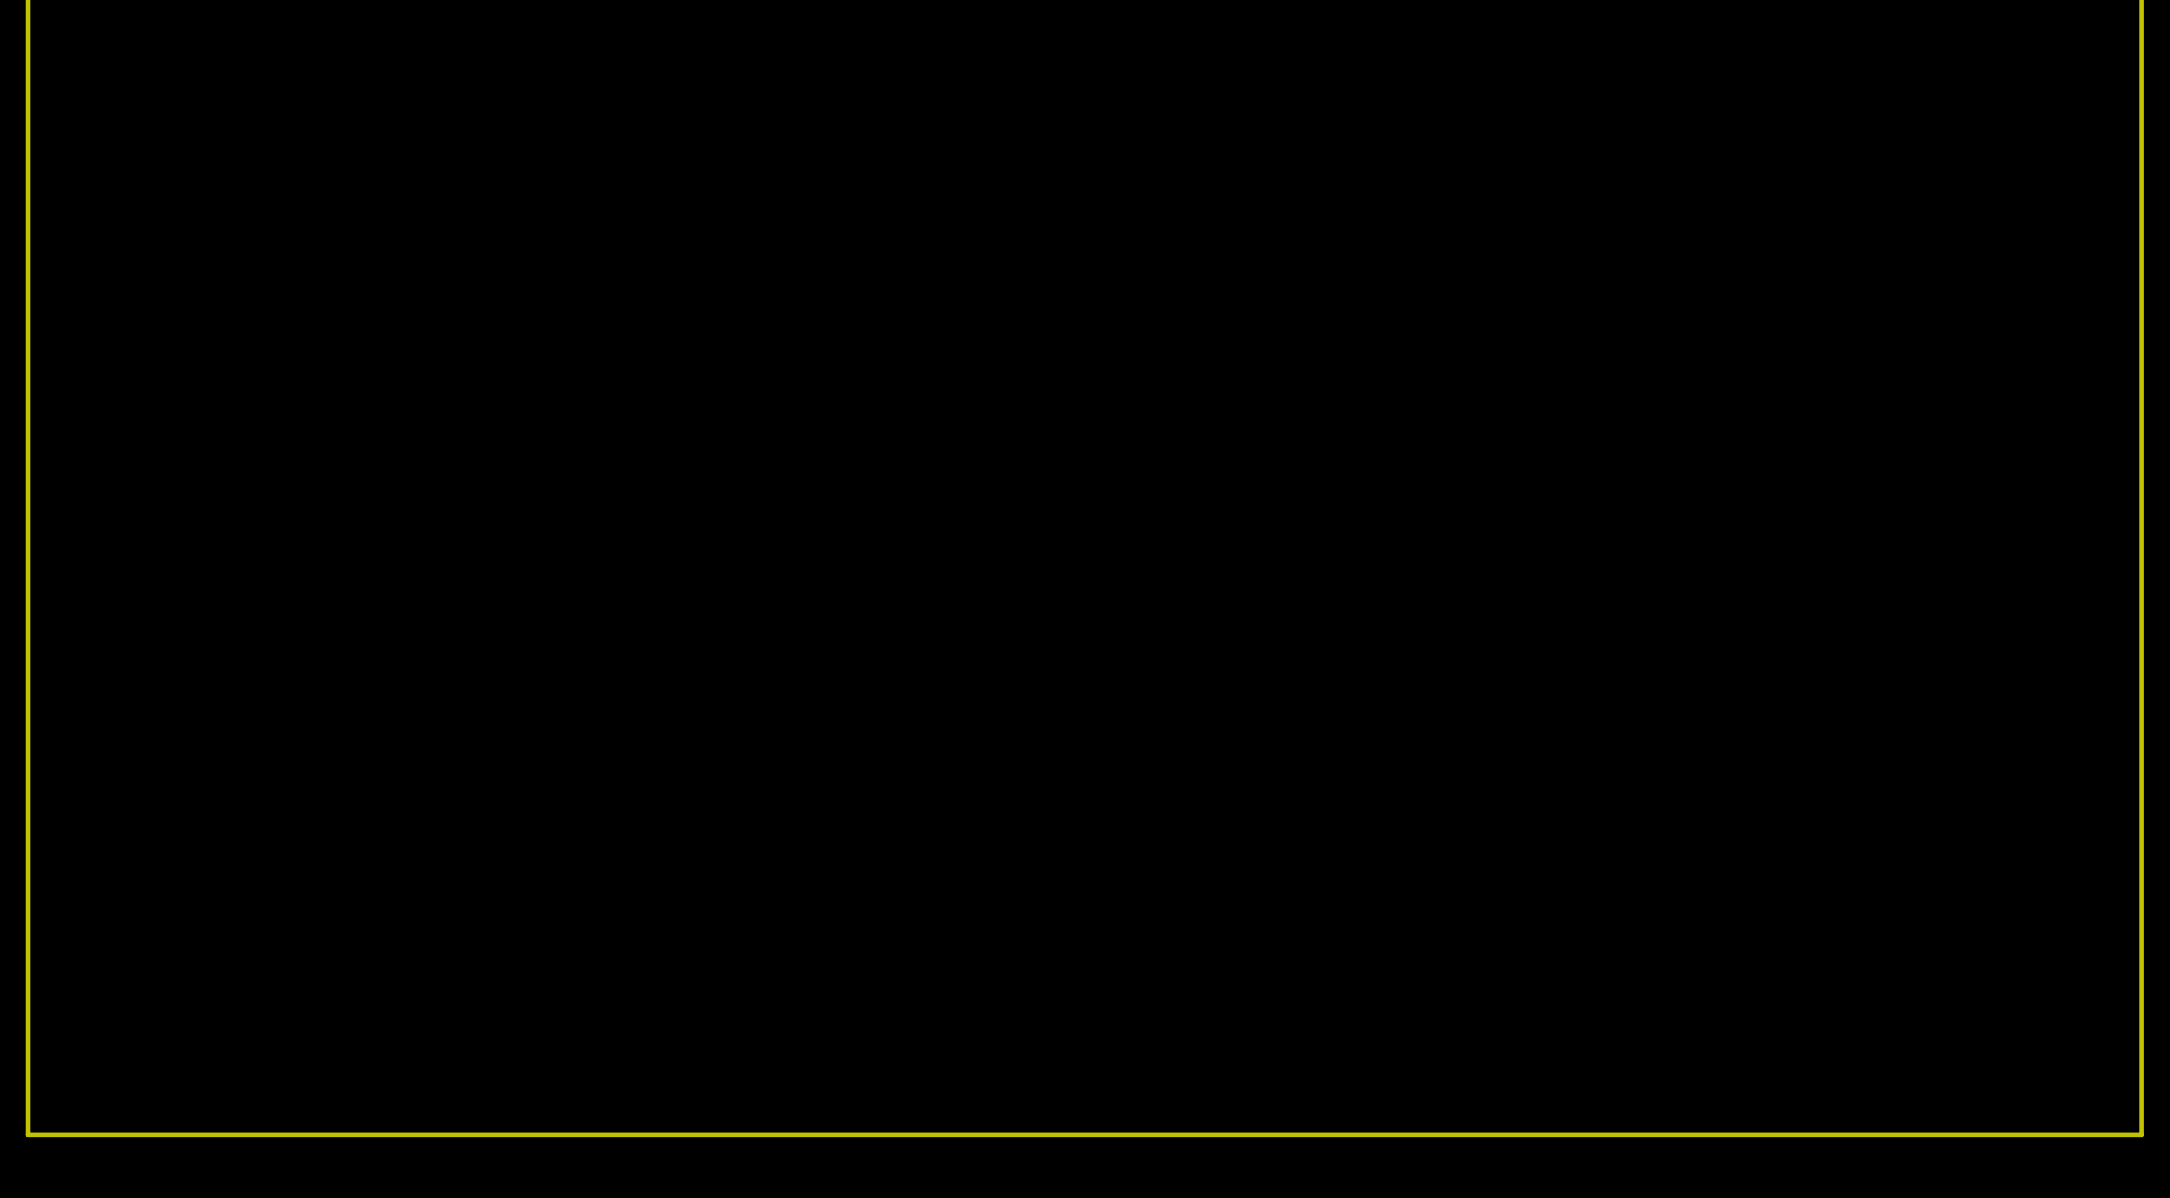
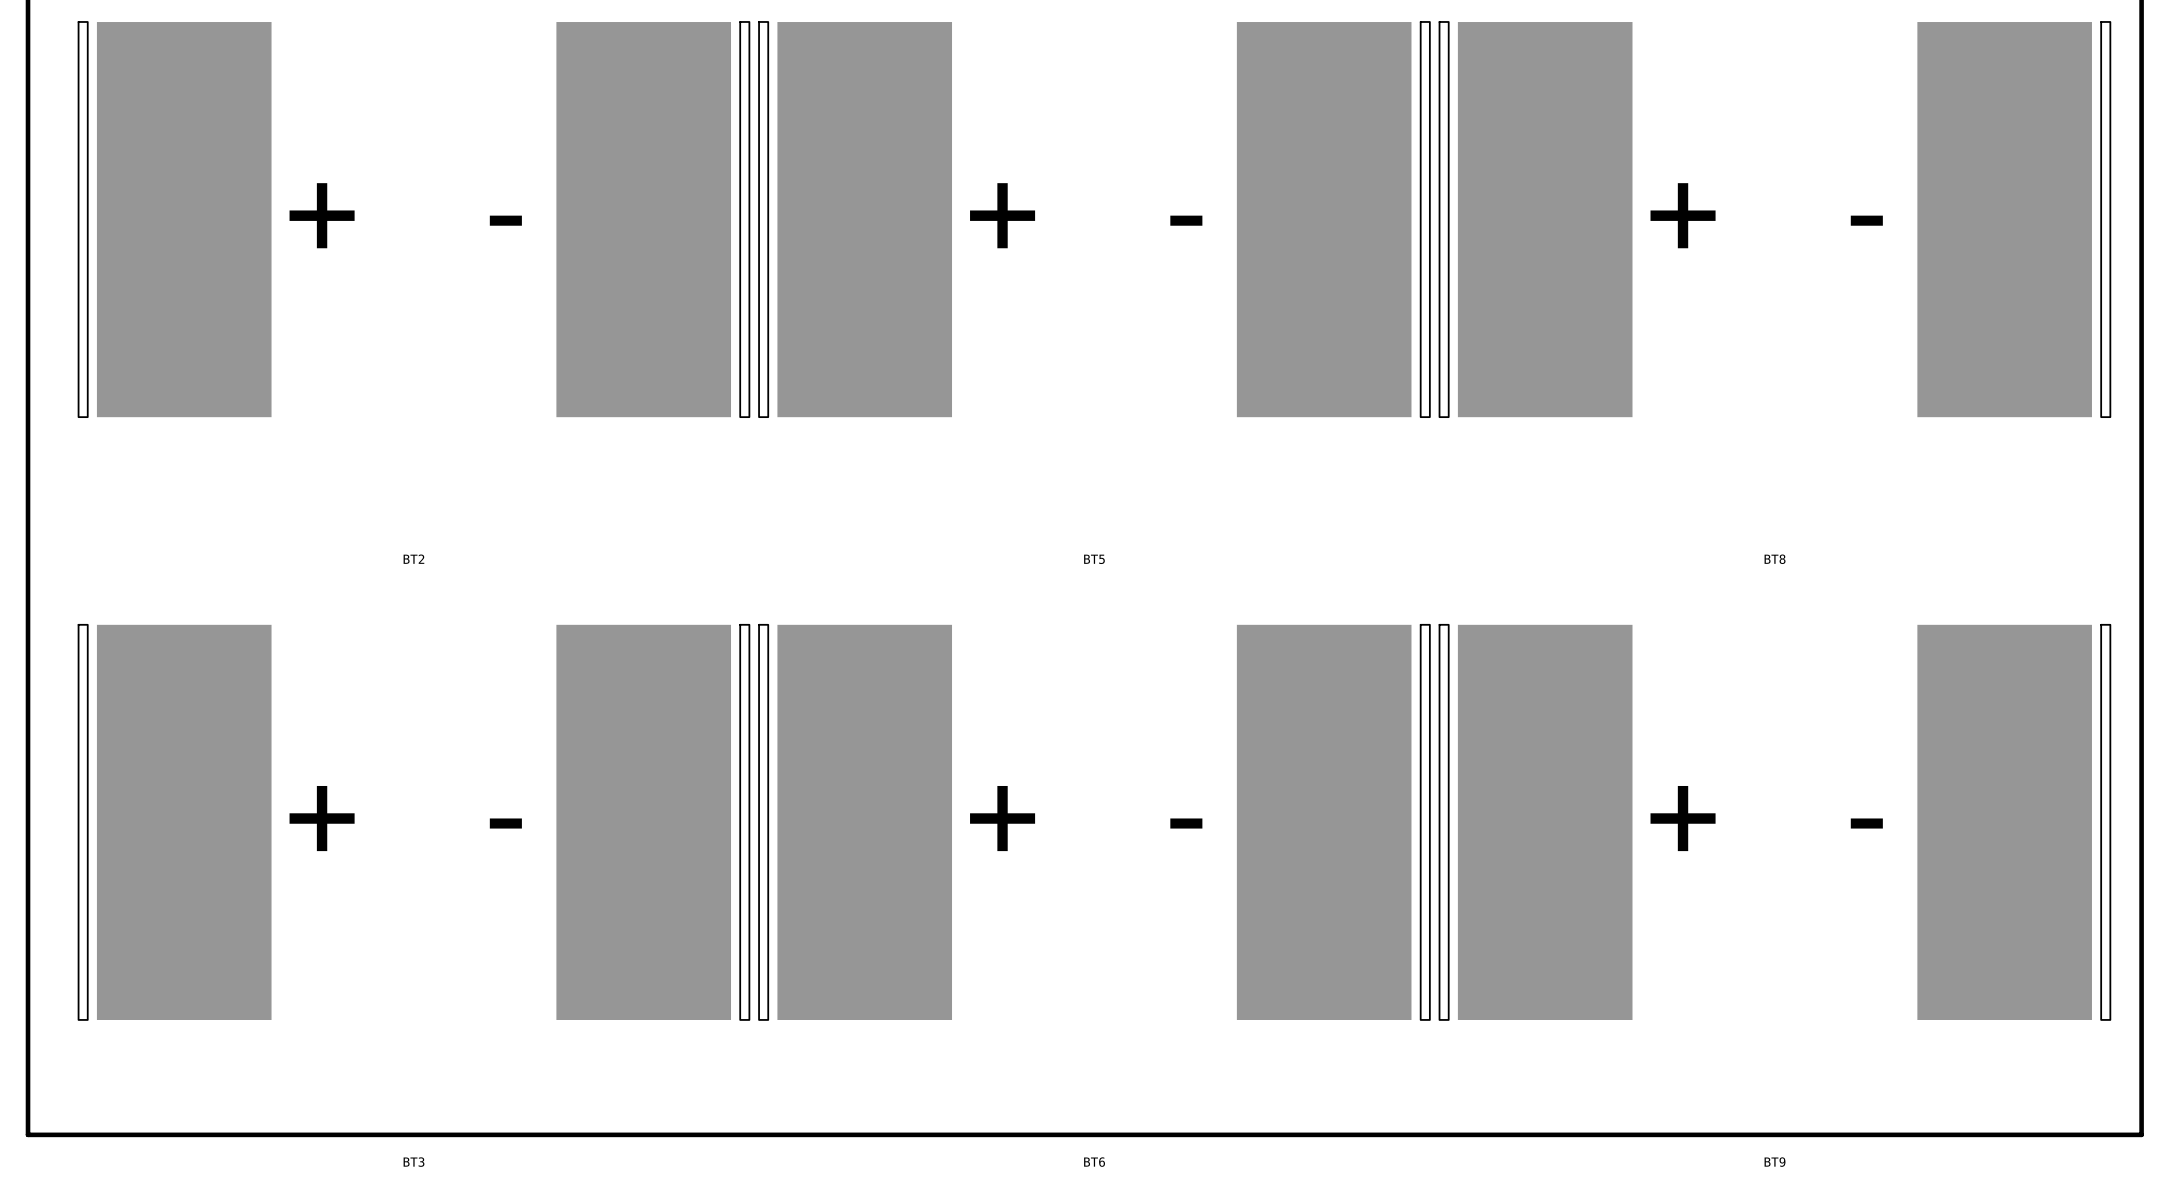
BT2: none -> (413, 219)
BT5: none -> (1094, 219)
BT8: none -> (1774, 219)
BT3: none -> (413, 822)
BT6: none -> (1094, 822)
BT9: none -> (1774, 822)

